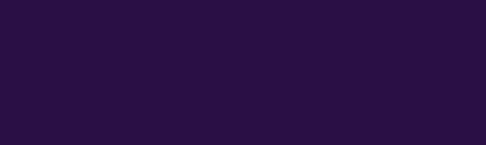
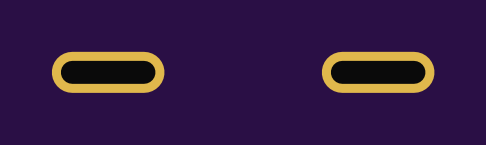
part: none -> (108, 72)
part: none -> (378, 72)

